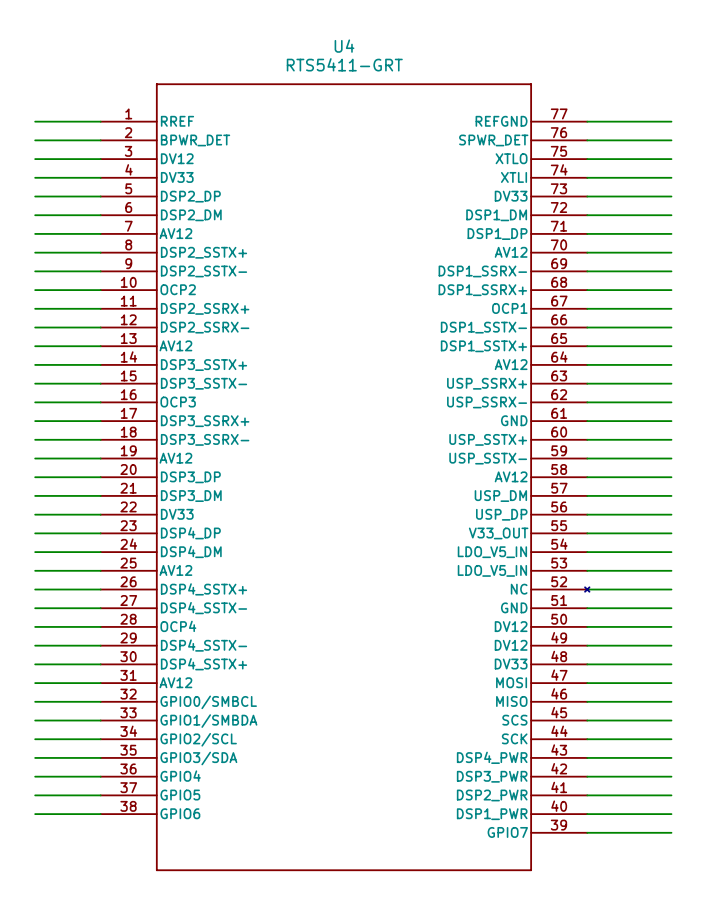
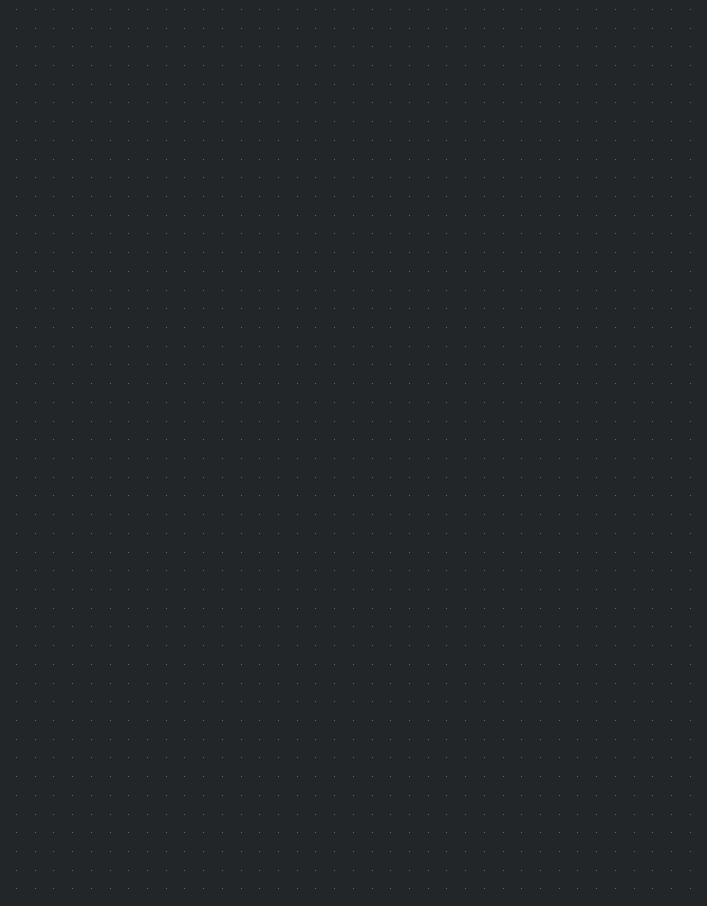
wire: (35, 121) (100, 121) -> none
wire: (587, 121) (671, 121) -> none
wire: (35, 140) (100, 140) -> none
wire: (587, 140) (671, 140) -> none
wire: (35, 159) (100, 159) -> none
wire: (587, 159) (671, 159) -> none
wire: (35, 177) (100, 177) -> none
wire: (587, 177) (671, 177) -> none
wire: (35, 196) (100, 196) -> none
wire: (587, 196) (671, 196) -> none
wire: (35, 215) (100, 215) -> none
wire: (587, 215) (671, 215) -> none
wire: (35, 233) (100, 233) -> none
wire: (587, 233) (671, 233) -> none
wire: (35, 252) (100, 252) -> none
wire: (587, 252) (671, 252) -> none
wire: (35, 271) (100, 271) -> none
wire: (587, 271) (671, 271) -> none
wire: (35, 290) (100, 290) -> none
wire: (587, 290) (671, 290) -> none
wire: (35, 308) (100, 308) -> none
wire: (587, 308) (671, 308) -> none
wire: (35, 327) (100, 327) -> none
wire: (587, 327) (671, 327) -> none
wire: (35, 346) (100, 346) -> none
wire: (587, 346) (671, 346) -> none
wire: (35, 364) (100, 364) -> none
wire: (587, 364) (671, 364) -> none
wire: (35, 383) (100, 383) -> none
wire: (587, 383) (671, 383) -> none
wire: (35, 402) (100, 402) -> none
wire: (587, 402) (671, 402) -> none
wire: (35, 421) (100, 421) -> none
wire: (587, 421) (671, 421) -> none
wire: (35, 439) (100, 439) -> none
wire: (587, 439) (671, 439) -> none
wire: (35, 458) (100, 458) -> none
wire: (587, 458) (671, 458) -> none
wire: (35, 477) (100, 477) -> none
U4: RTS5411-GRT (345, 477) -> none
wire: (587, 477) (671, 477) -> none
wire: (35, 495) (100, 495) -> none
wire: (587, 495) (671, 495) -> none
wire: (35, 514) (100, 514) -> none
wire: (587, 514) (671, 514) -> none
wire: (35, 533) (100, 533) -> none
wire: (587, 533) (671, 533) -> none
wire: (35, 552) (100, 552) -> none
wire: (587, 552) (671, 552) -> none
wire: (35, 570) (100, 570) -> none
wire: (587, 570) (671, 570) -> none
wire: (35, 589) (100, 589) -> none
wire: (587, 589) (671, 589) -> none
wire: (35, 608) (100, 608) -> none
wire: (587, 608) (671, 608) -> none
wire: (35, 626) (100, 626) -> none
wire: (587, 626) (671, 626) -> none
wire: (35, 645) (100, 645) -> none
wire: (587, 645) (671, 645) -> none
wire: (35, 664) (100, 664) -> none
wire: (587, 664) (671, 664) -> none
wire: (35, 683) (100, 683) -> none
wire: (587, 683) (671, 683) -> none
wire: (35, 701) (100, 701) -> none
wire: (587, 701) (671, 701) -> none
wire: (35, 720) (100, 720) -> none
wire: (587, 720) (671, 720) -> none
wire: (35, 739) (100, 739) -> none
wire: (587, 739) (671, 739) -> none
wire: (35, 757) (100, 757) -> none
wire: (587, 757) (671, 757) -> none
wire: (35, 776) (100, 776) -> none
wire: (587, 776) (671, 776) -> none
wire: (35, 795) (100, 795) -> none
wire: (587, 795) (671, 795) -> none
wire: (35, 814) (100, 814) -> none
wire: (587, 814) (671, 814) -> none
wire: (587, 832) (671, 832) -> none

